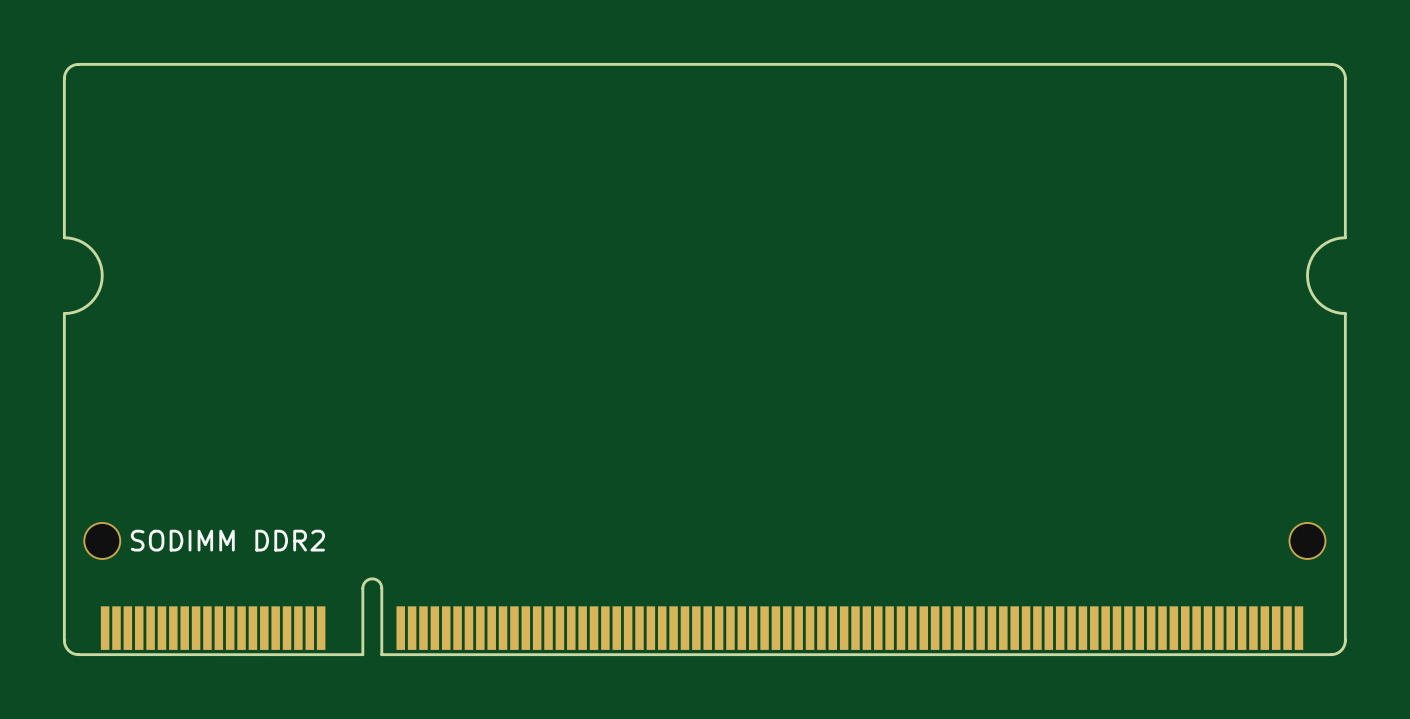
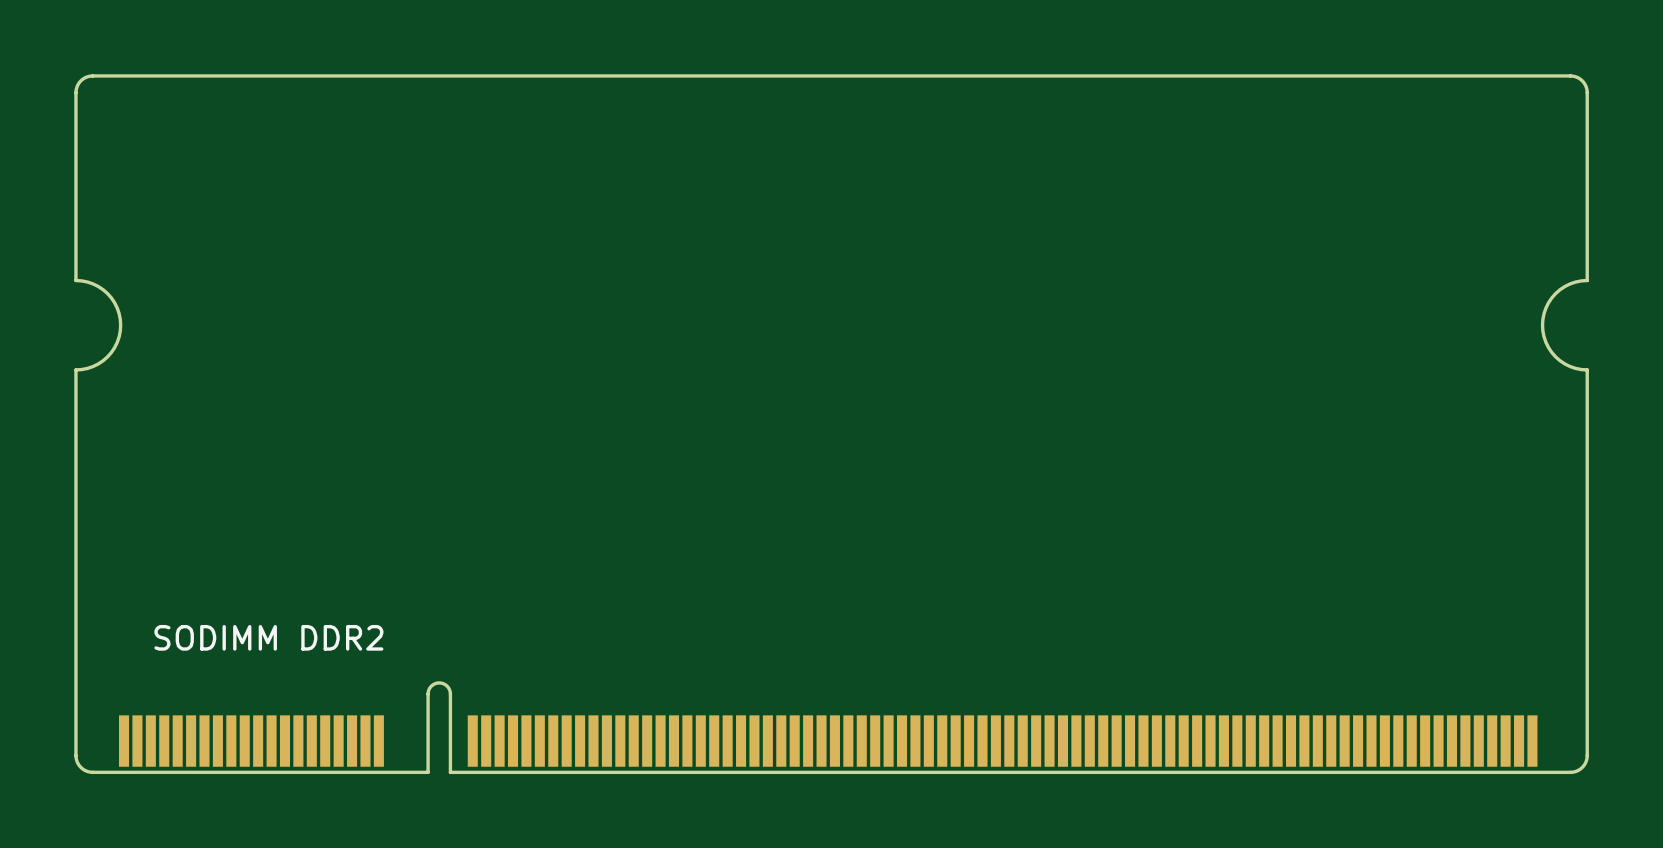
via: (102, 540) -> none
via: (1307, 540) -> none

